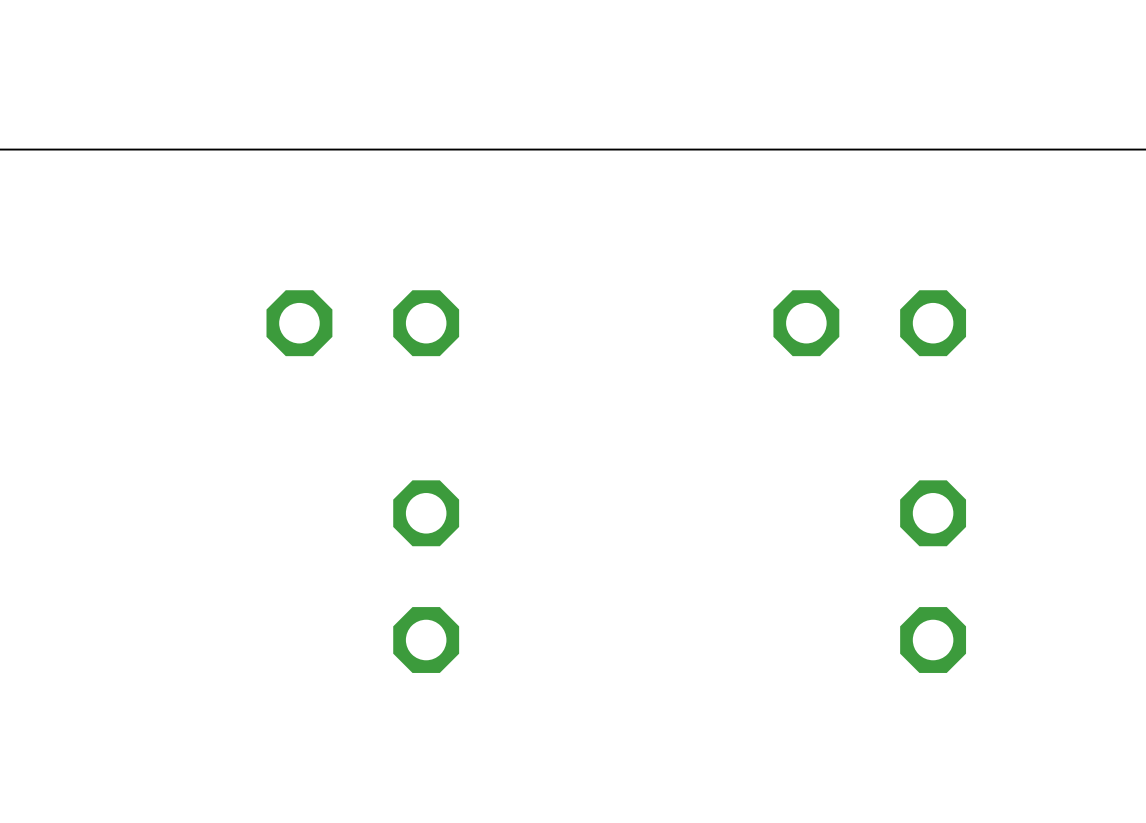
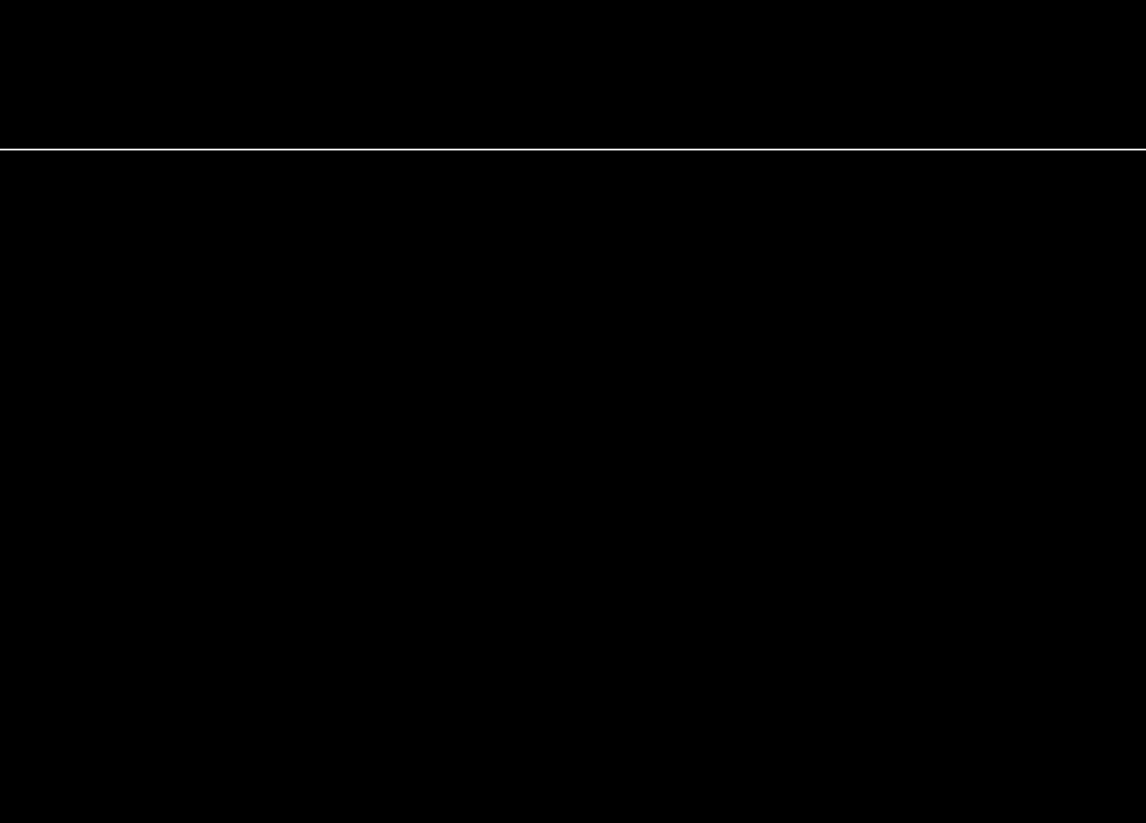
part: (362, 323) -> none
part: (869, 323) -> none
part: (426, 576) -> none
part: (933, 576) -> none

